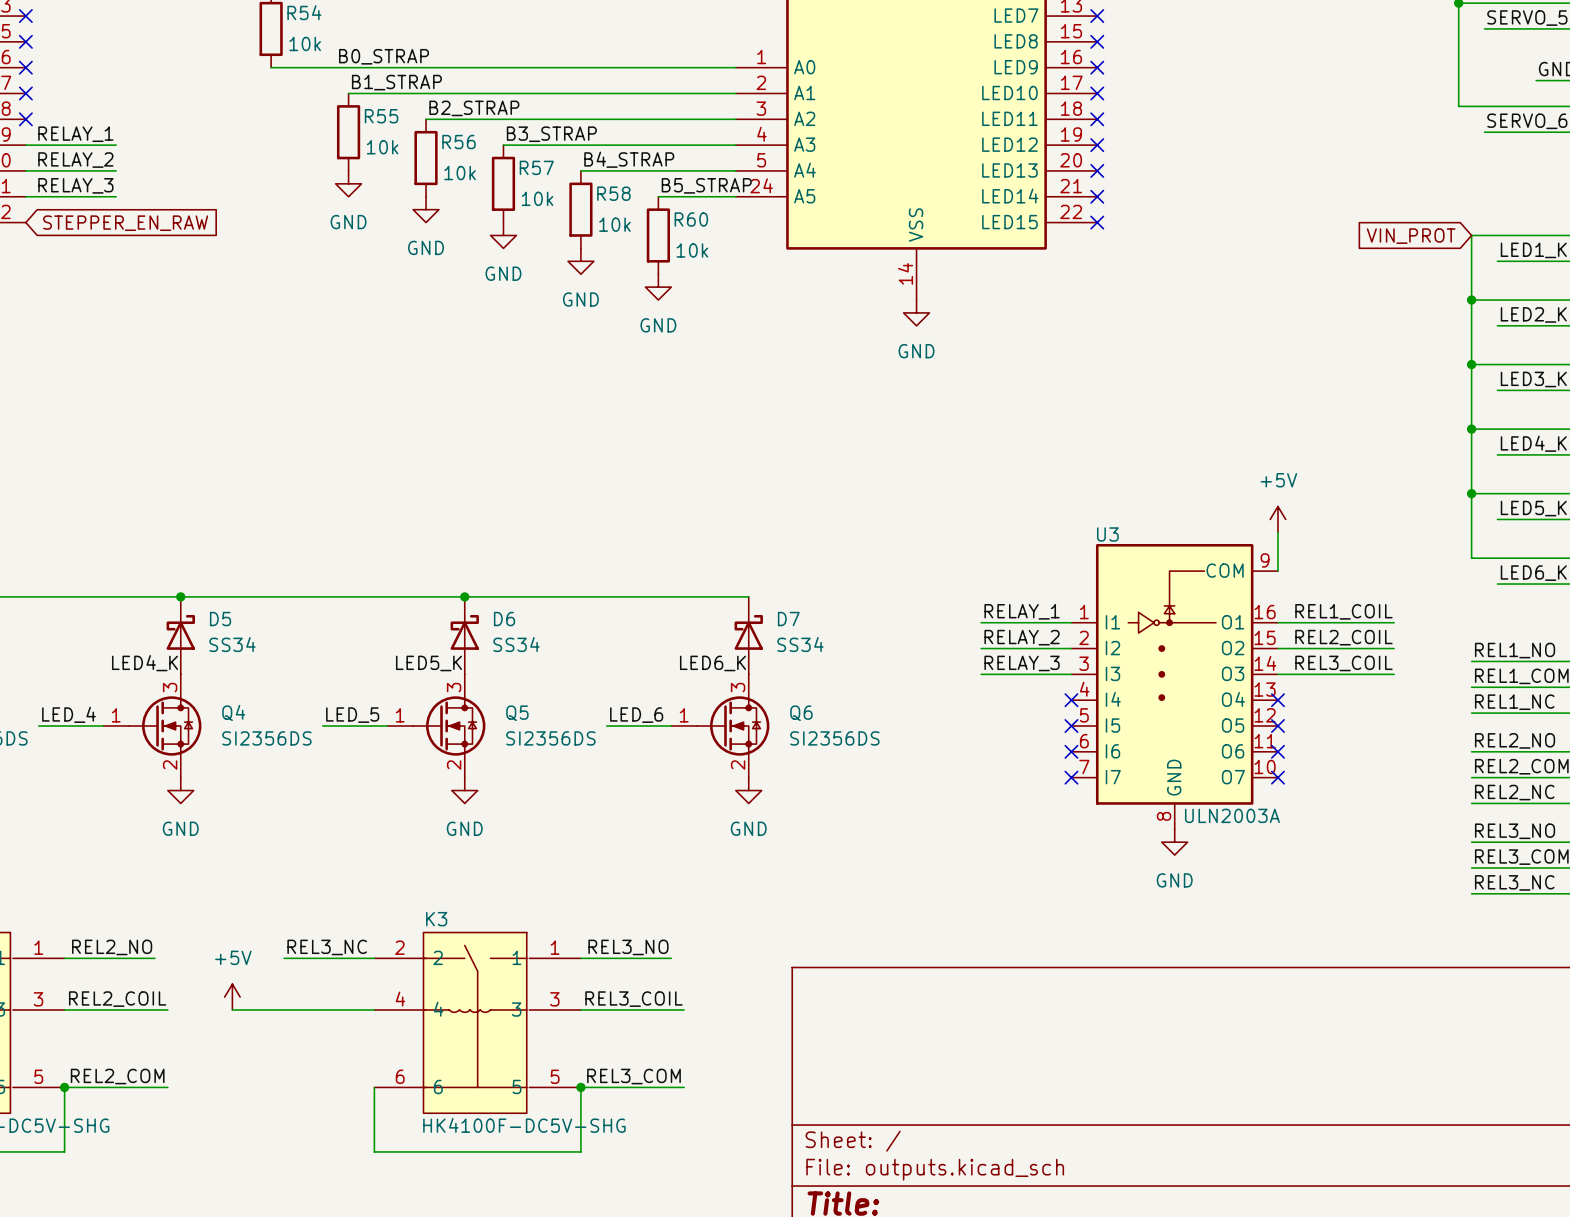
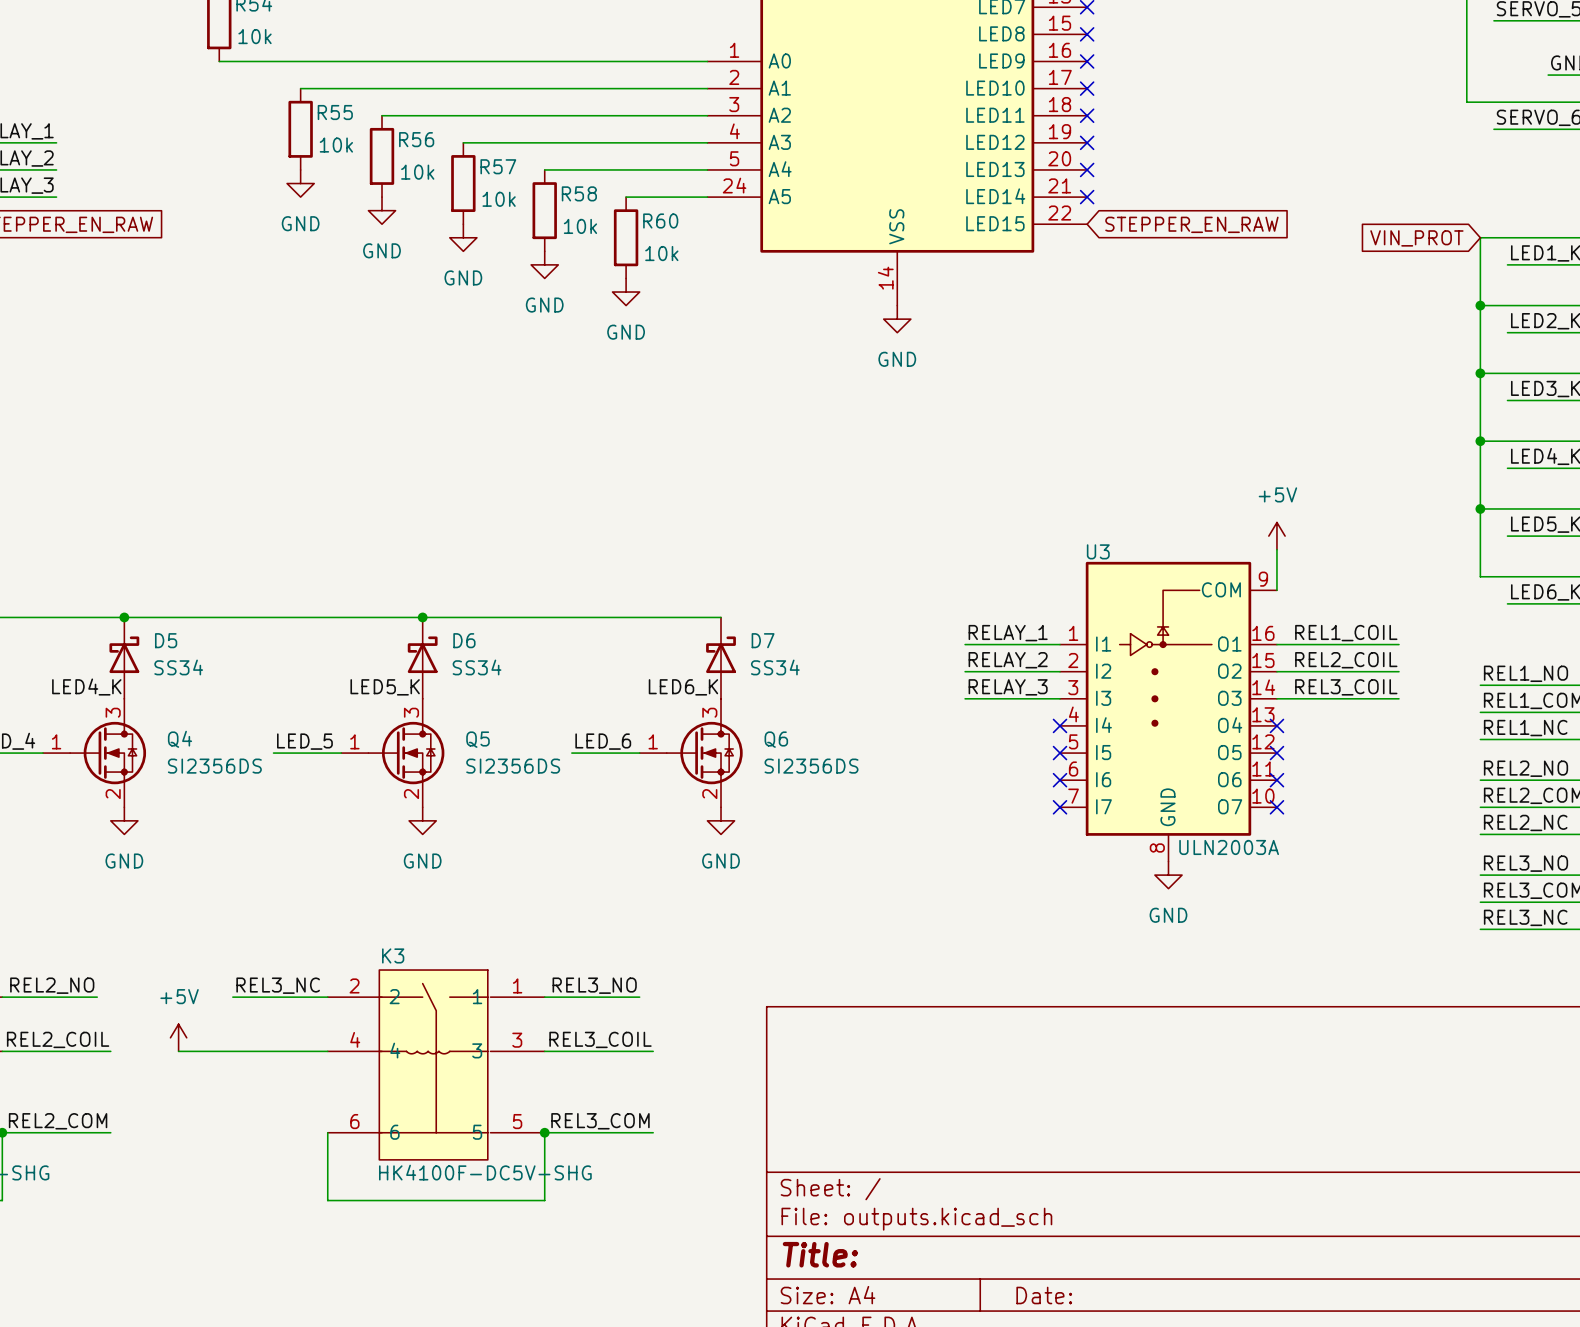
label: B0_STRAP (384, 56) -> none
label: B1_STRAP (396, 82) -> none
label: B2_STRAP (474, 108) -> none
label: B3_STRAP (551, 134) -> none
label: B4_STRAP (629, 159) -> none
label: B5_STRAP (706, 185) -> none
no-connect mark: (1097, 222) -> none
global label: none -> STEPPER_EN_RAW (1191, 224)

